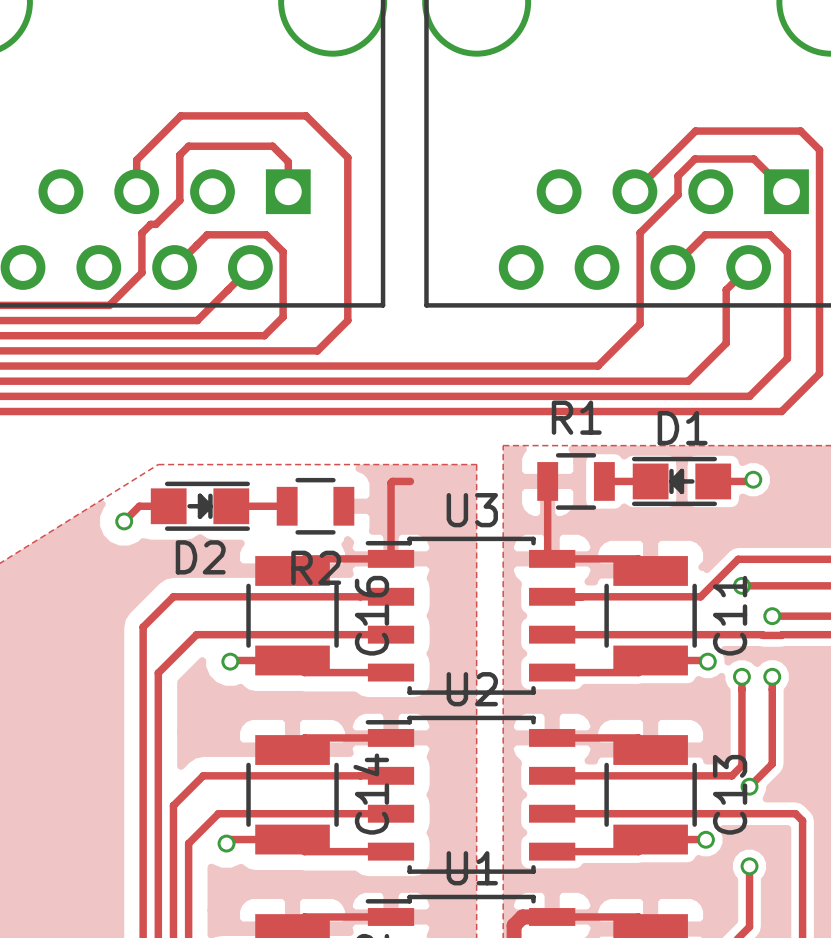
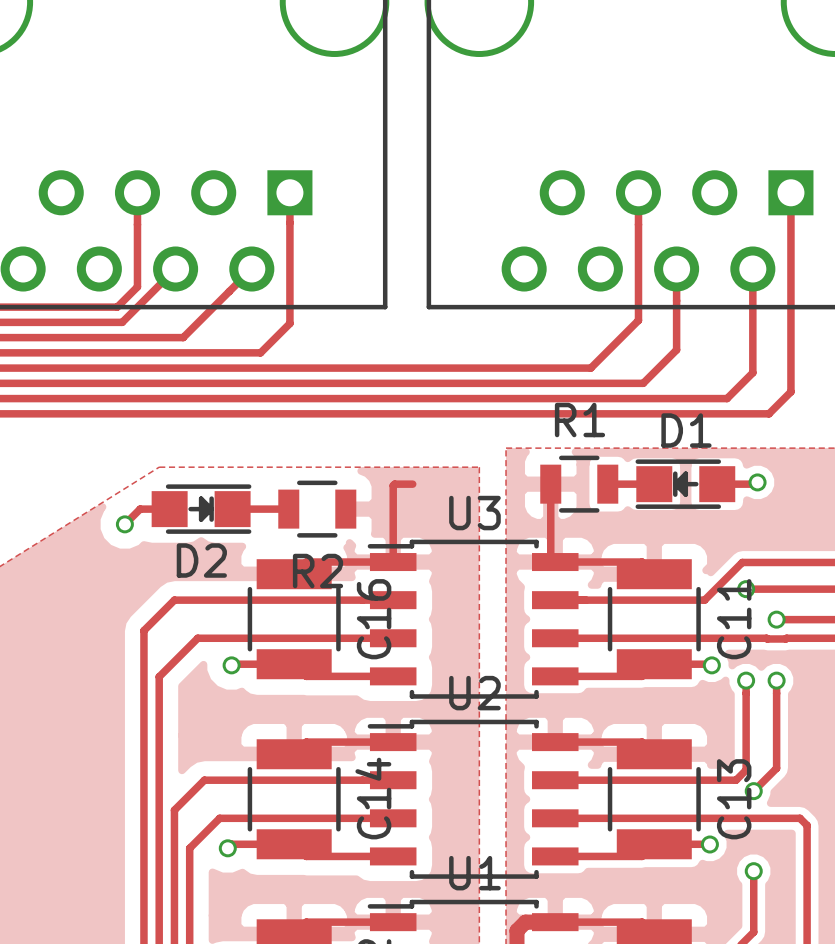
track: (136, 191) (136, 160) (180, 115) (306, 115) (347, 157) (347, 320) (317, 350) (259, 350) -> (289, 192) (289, 323) (260, 352)
track: (288, 191) (288, 161) (272, 146) (188, 146) (179, 155) (179, 200) (155, 224) (150, 224) (141, 233) (141, 272) (109, 305) -> (137, 192) (137, 286) (117, 307) (109, 307)
track: (634, 191) (695, 131) (800, 131) (819, 149) (819, 373) (781, 411) (764, 411) -> (790, 192) (790, 391) (768, 413)
track: (786, 191) (753, 159) (695, 159) (678, 176) (678, 194) (640, 232) (640, 323) (597, 366) (587, 366) -> (638, 192) (638, 320) (590, 368)
track: (174, 267) (207, 234) (266, 234) (283, 251) (283, 317) (264, 335) (182, 335) -> (198, 322) (183, 337)
track: (672, 267) (705, 234) (769, 234) (787, 252) (787, 358) (749, 396) (723, 396) -> (752, 269) (752, 372) (727, 398)
track: (748, 267) (726, 289) (726, 343) (688, 381) (639, 381) -> (676, 269) (676, 349) (643, 383)
track: (121, 320) (197, 320) -> (122, 322) (175, 269)

